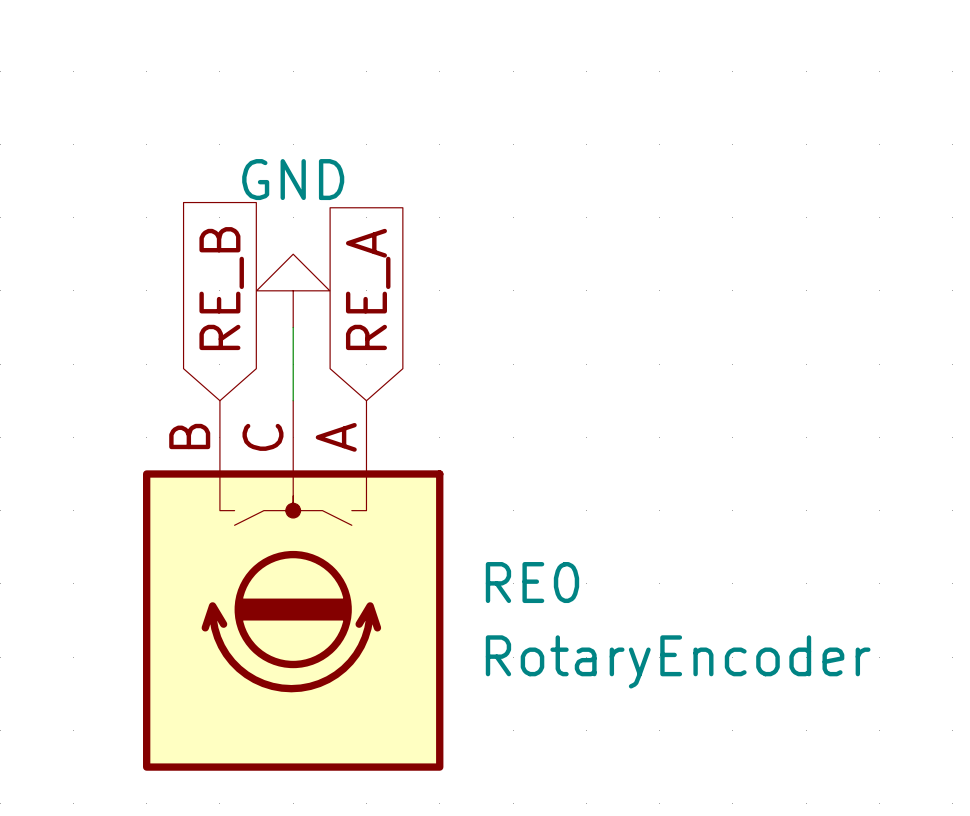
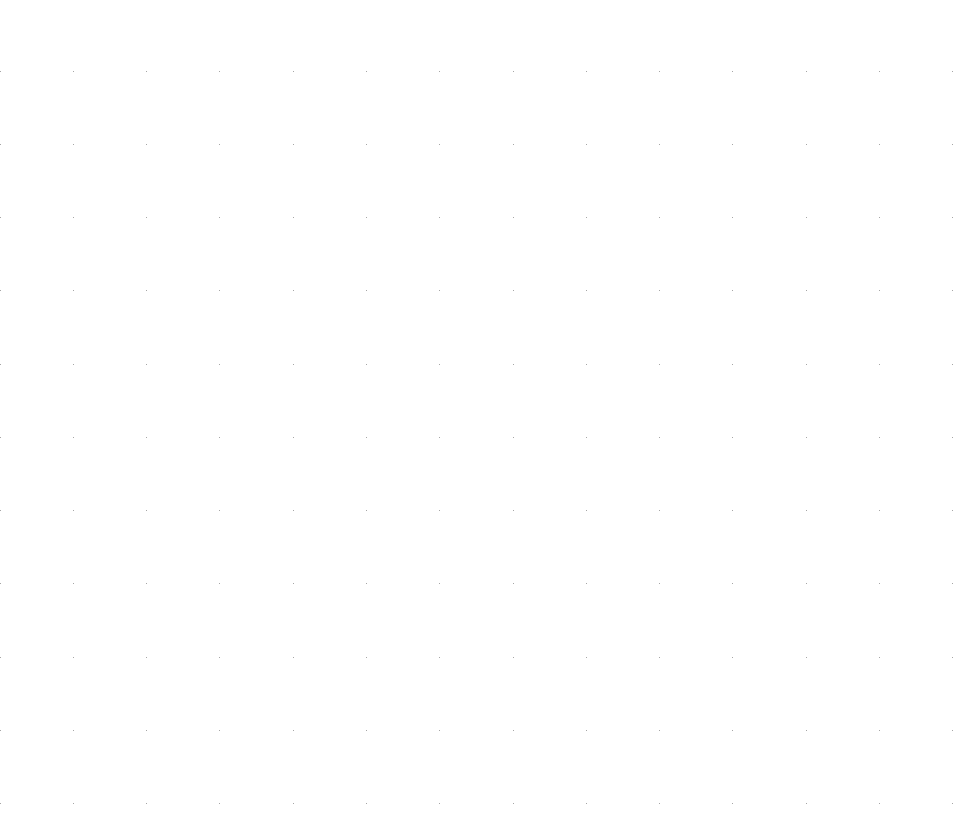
global label: RE_B (221, 288) -> none
global label: RE_A (368, 289) -> none
power symbol: GND (293, 290) -> none
wire: (293, 327) (293, 400) -> none
RE0: RotaryEncoder (293, 585) -> none

